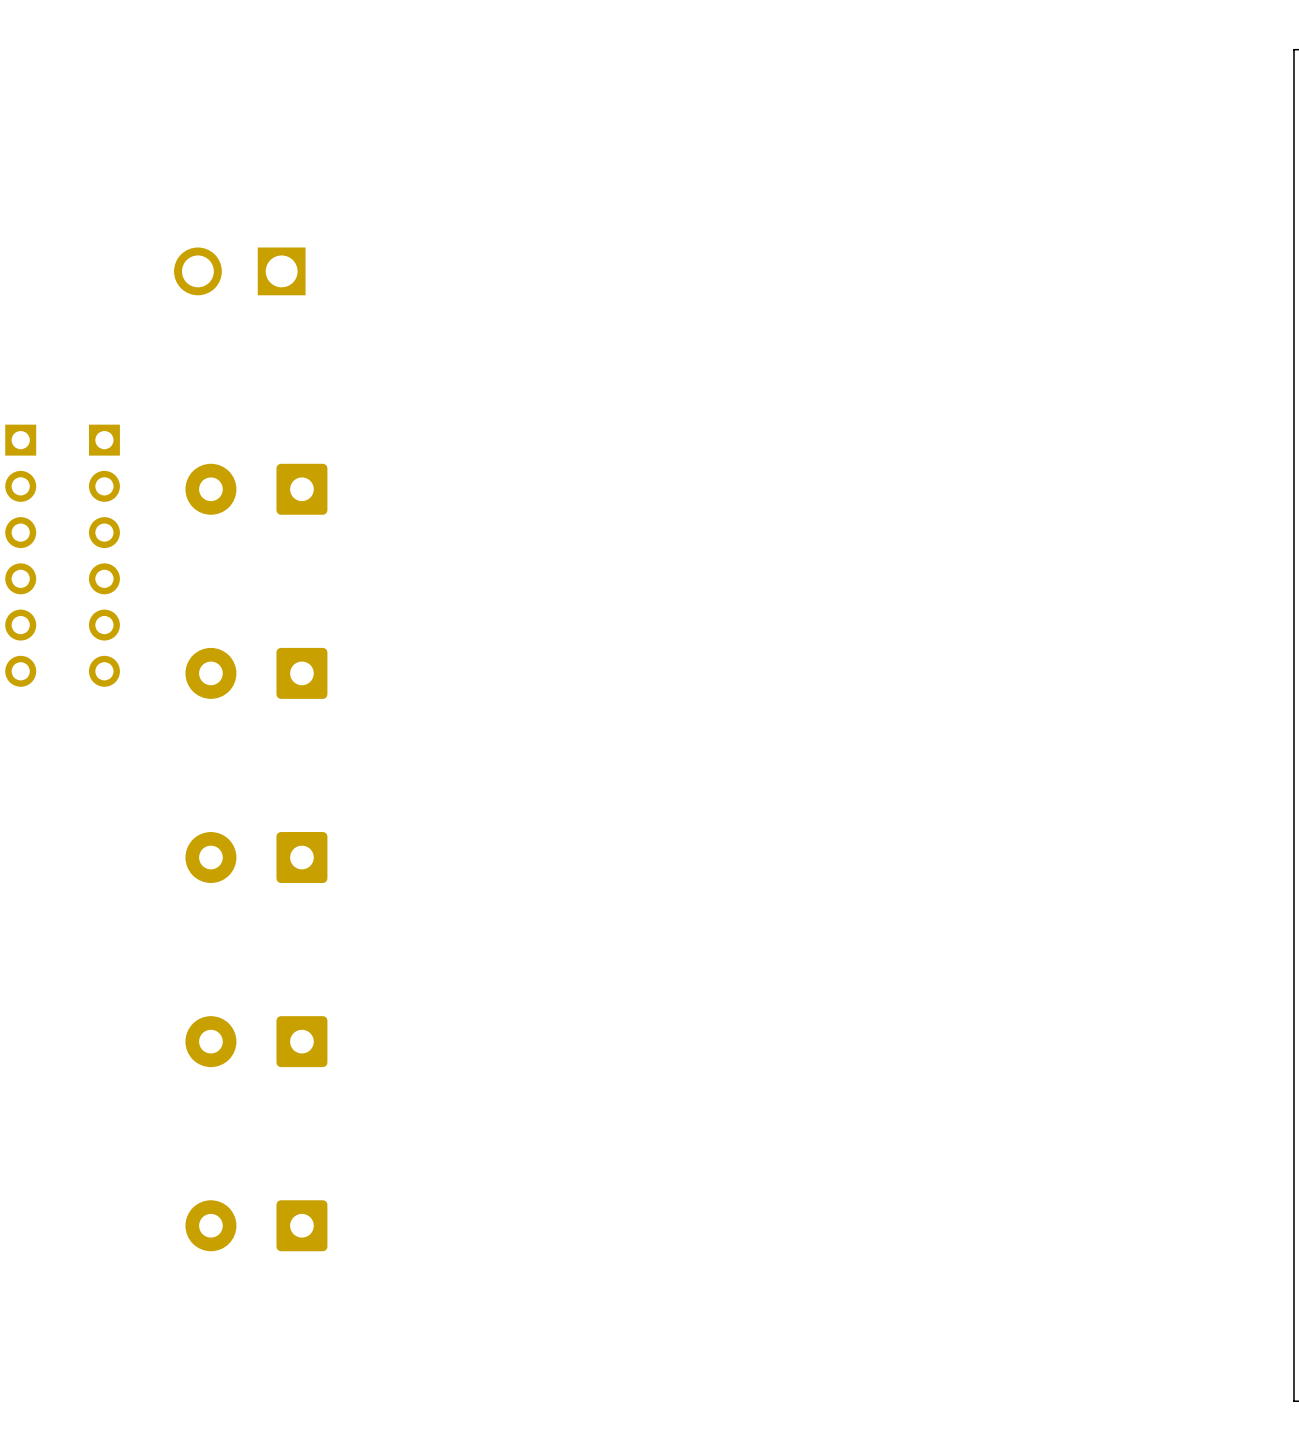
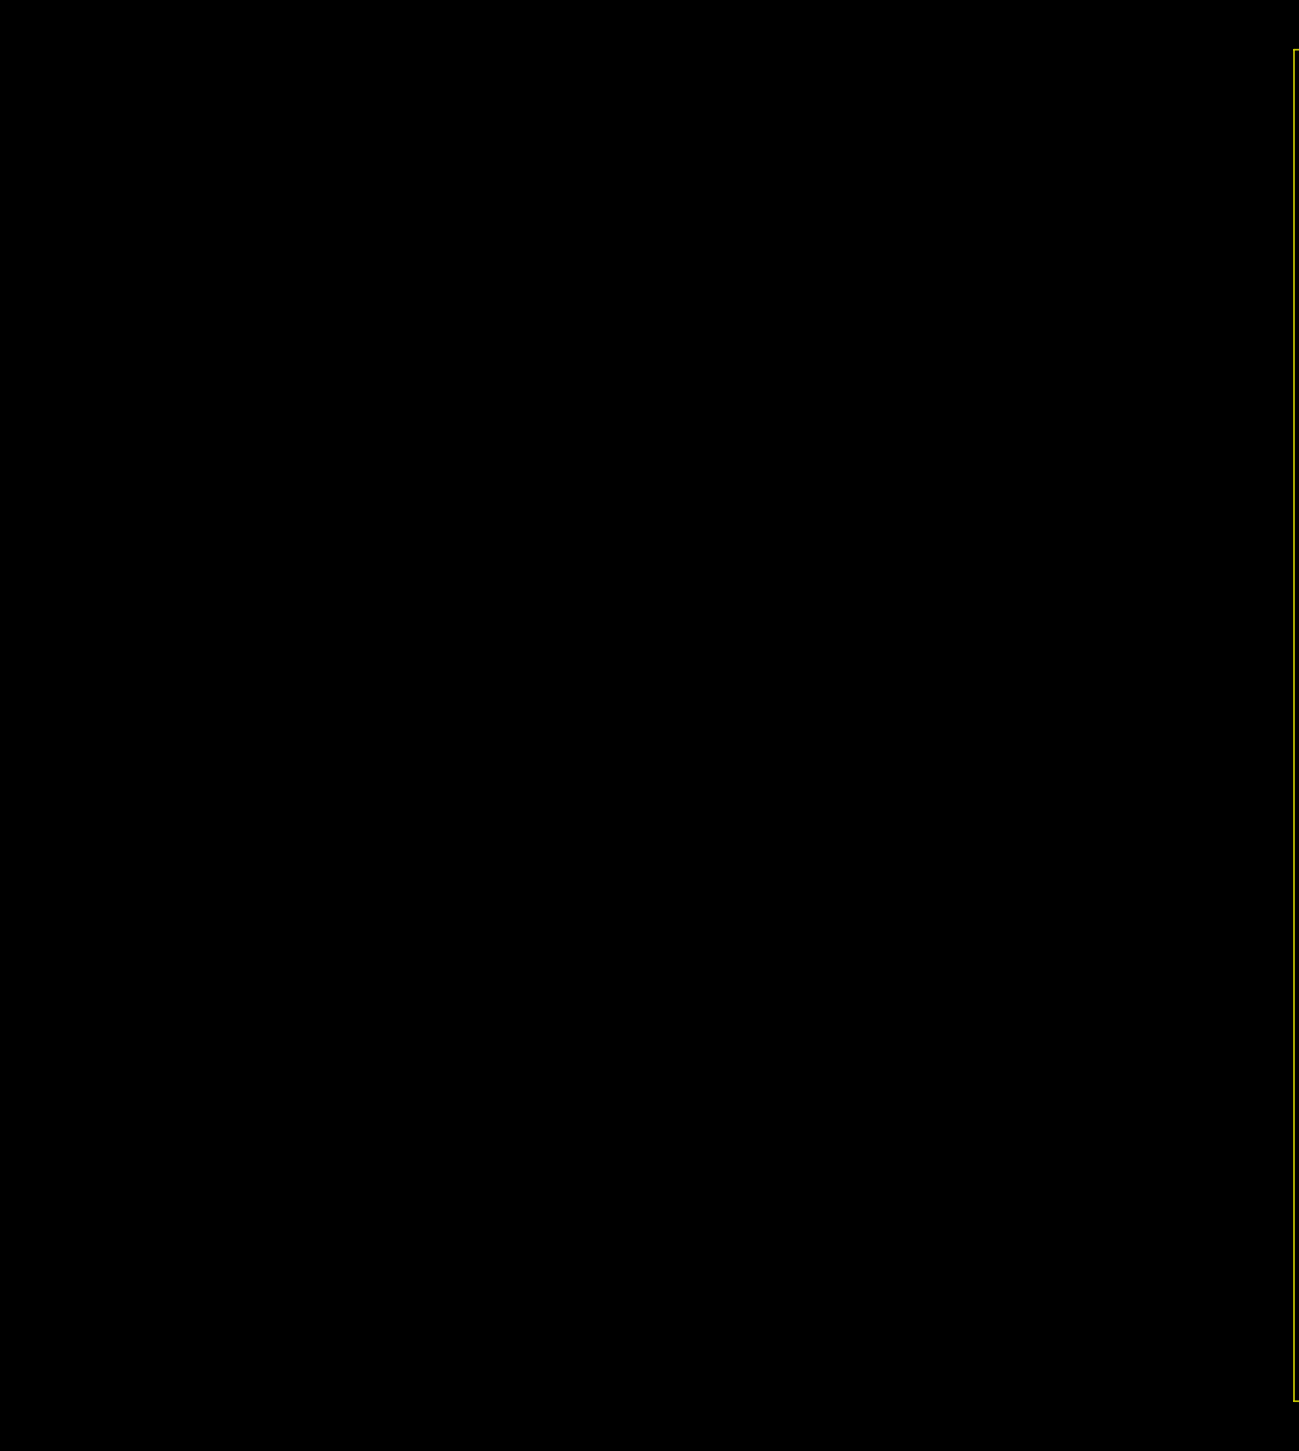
part: (239, 271) -> none
part: (256, 489) -> none
part: (20, 555) -> none
part: (104, 555) -> none
part: (256, 673) -> none
part: (256, 857) -> none
part: (256, 1041) -> none
part: (256, 1225) -> none

